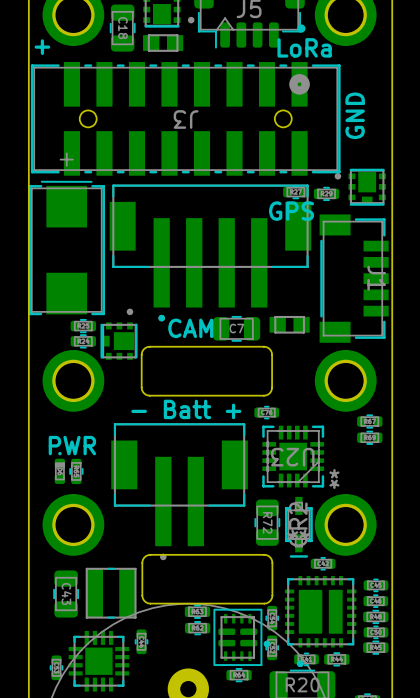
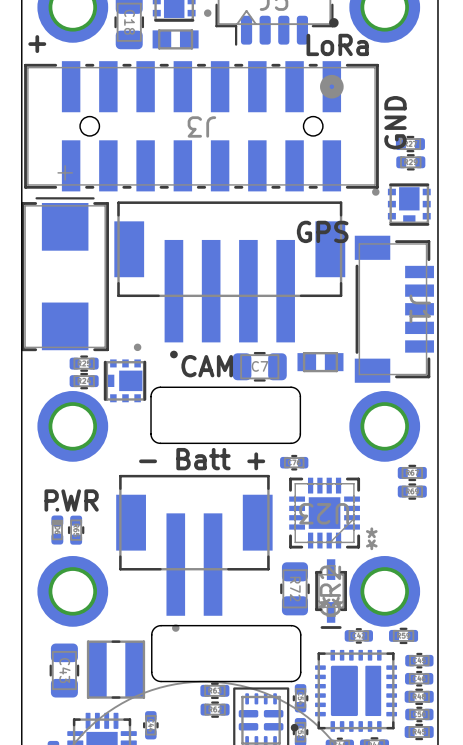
part position: (295, 192) -> (410, 144)
part position: (326, 193) -> (410, 162)
part: none -> (403, 635)

